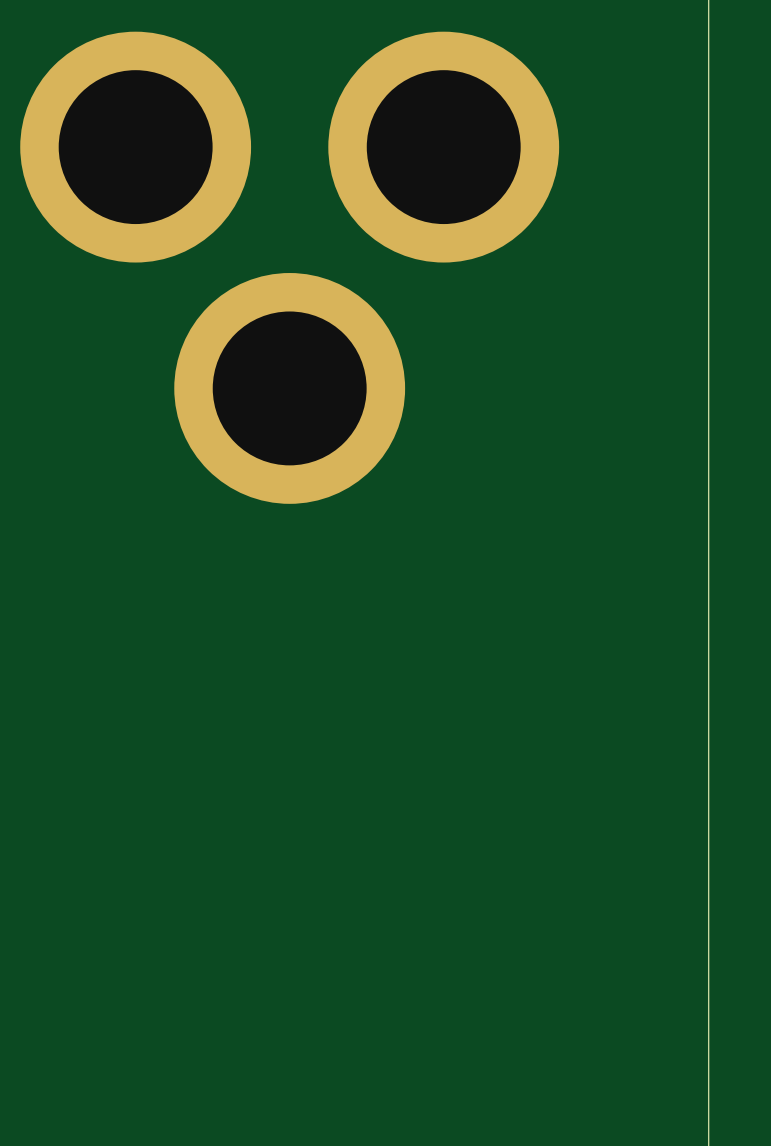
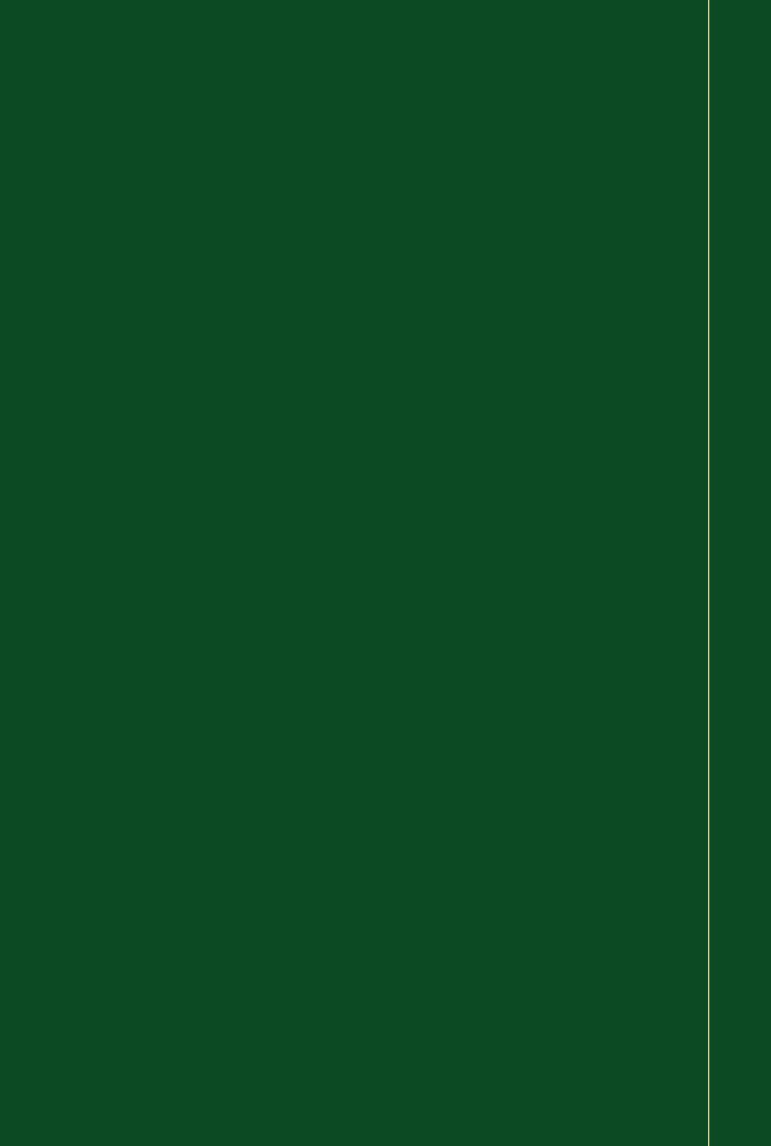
part: (289, 267) -> none

